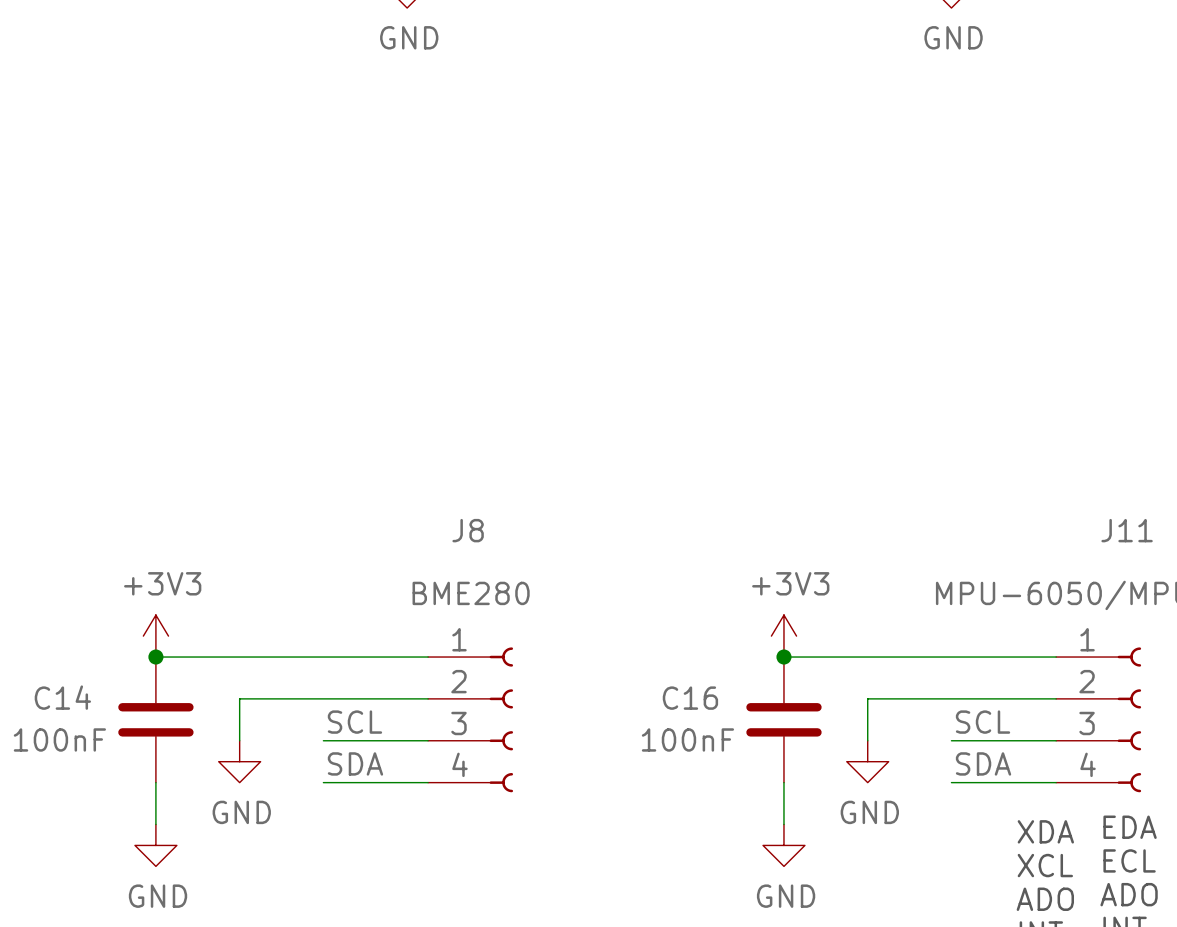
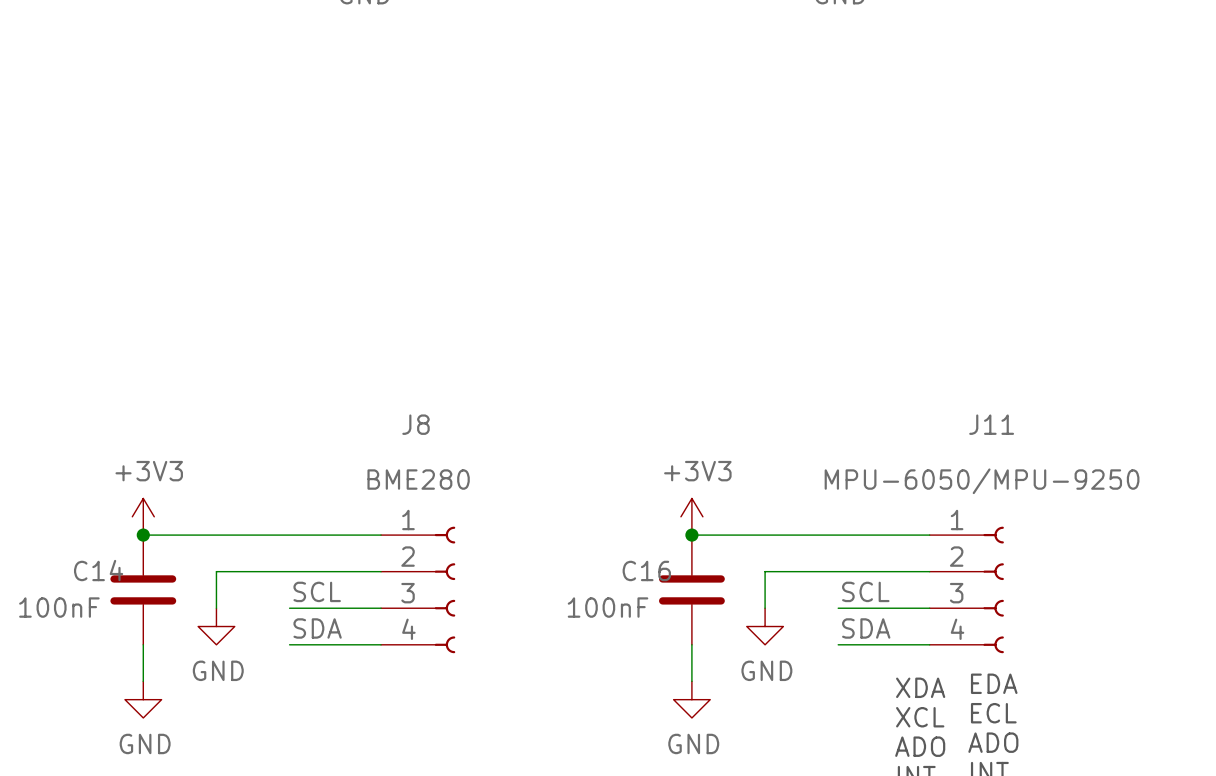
C14 name position: C14 (62, 697) -> C14 (98, 570)
C16 name position: C16 (690, 698) -> C16 (646, 570)

